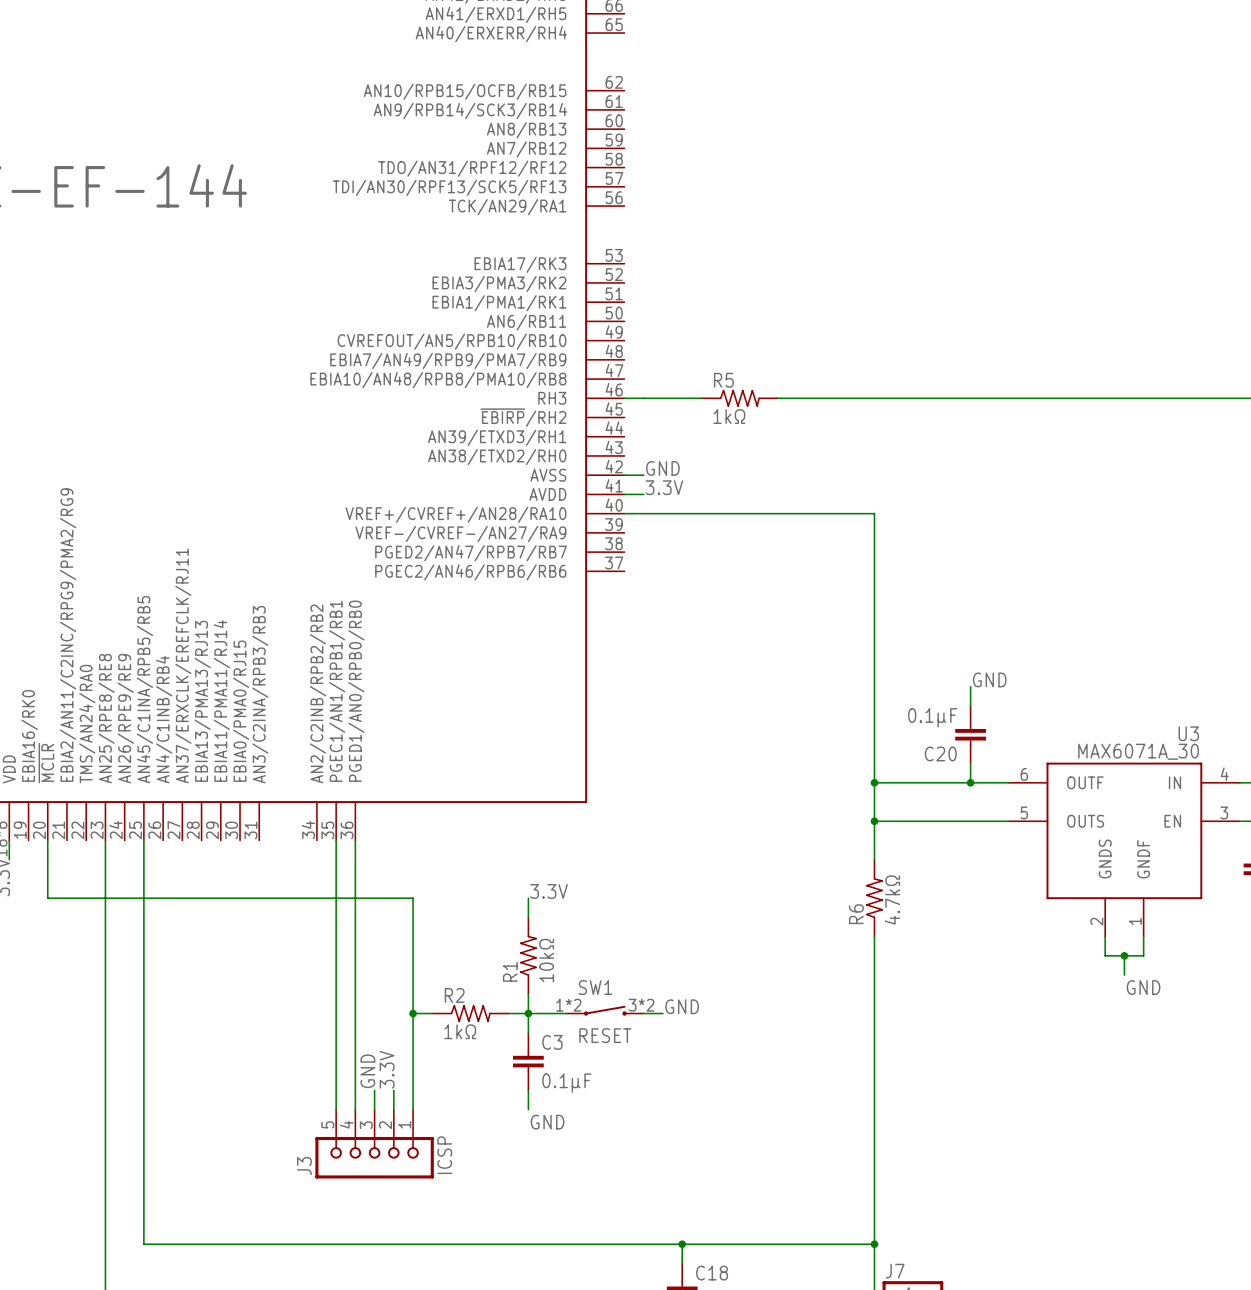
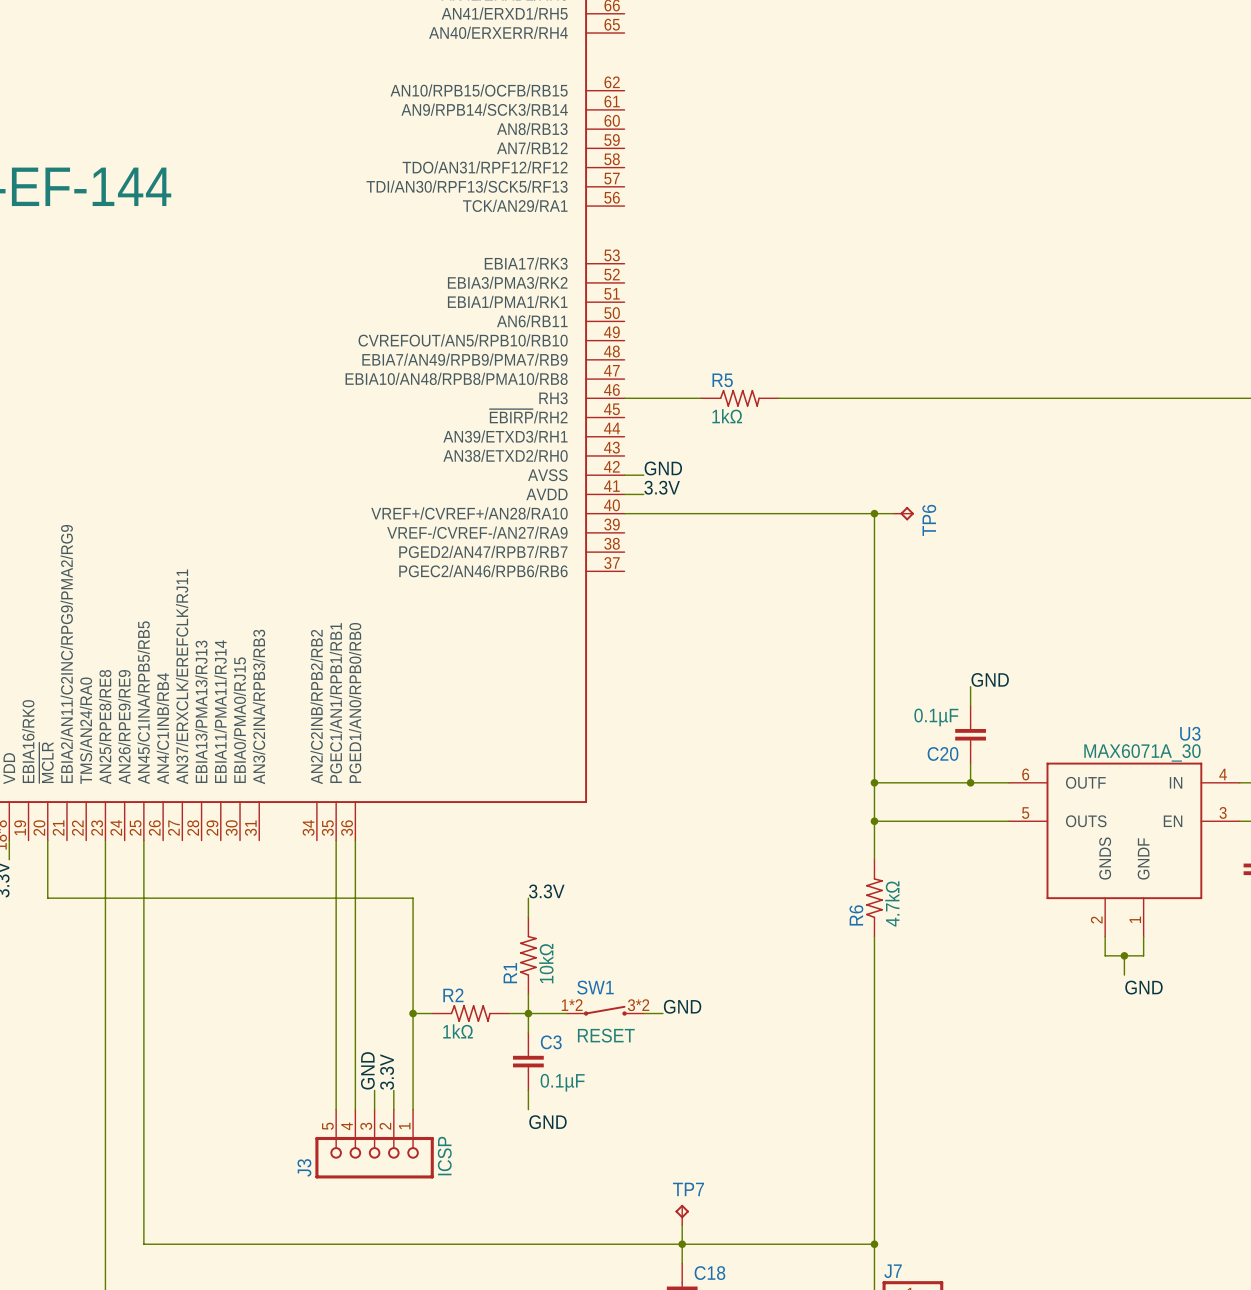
wire: none -> (874, 513) (893, 513)
junction: none -> (874, 513)
TP6: none -> (903, 513)
TP7: none -> (682, 1214)
wire: none -> (682, 1225) (682, 1244)

